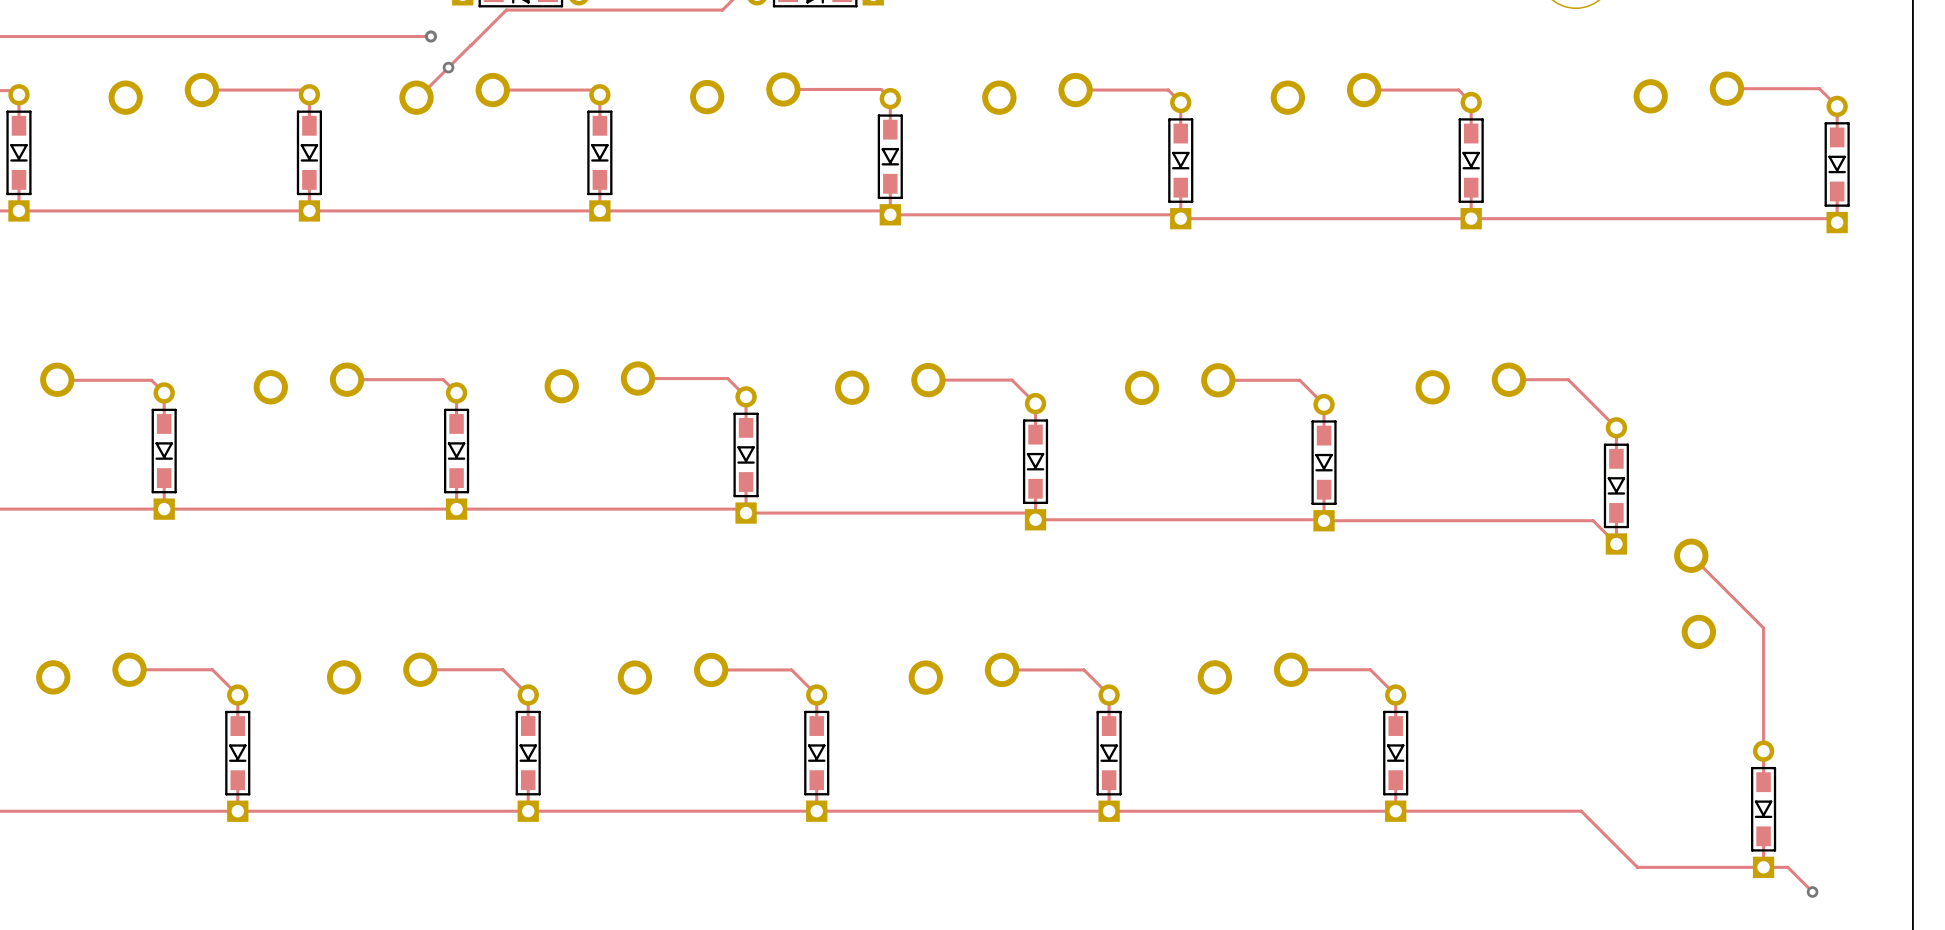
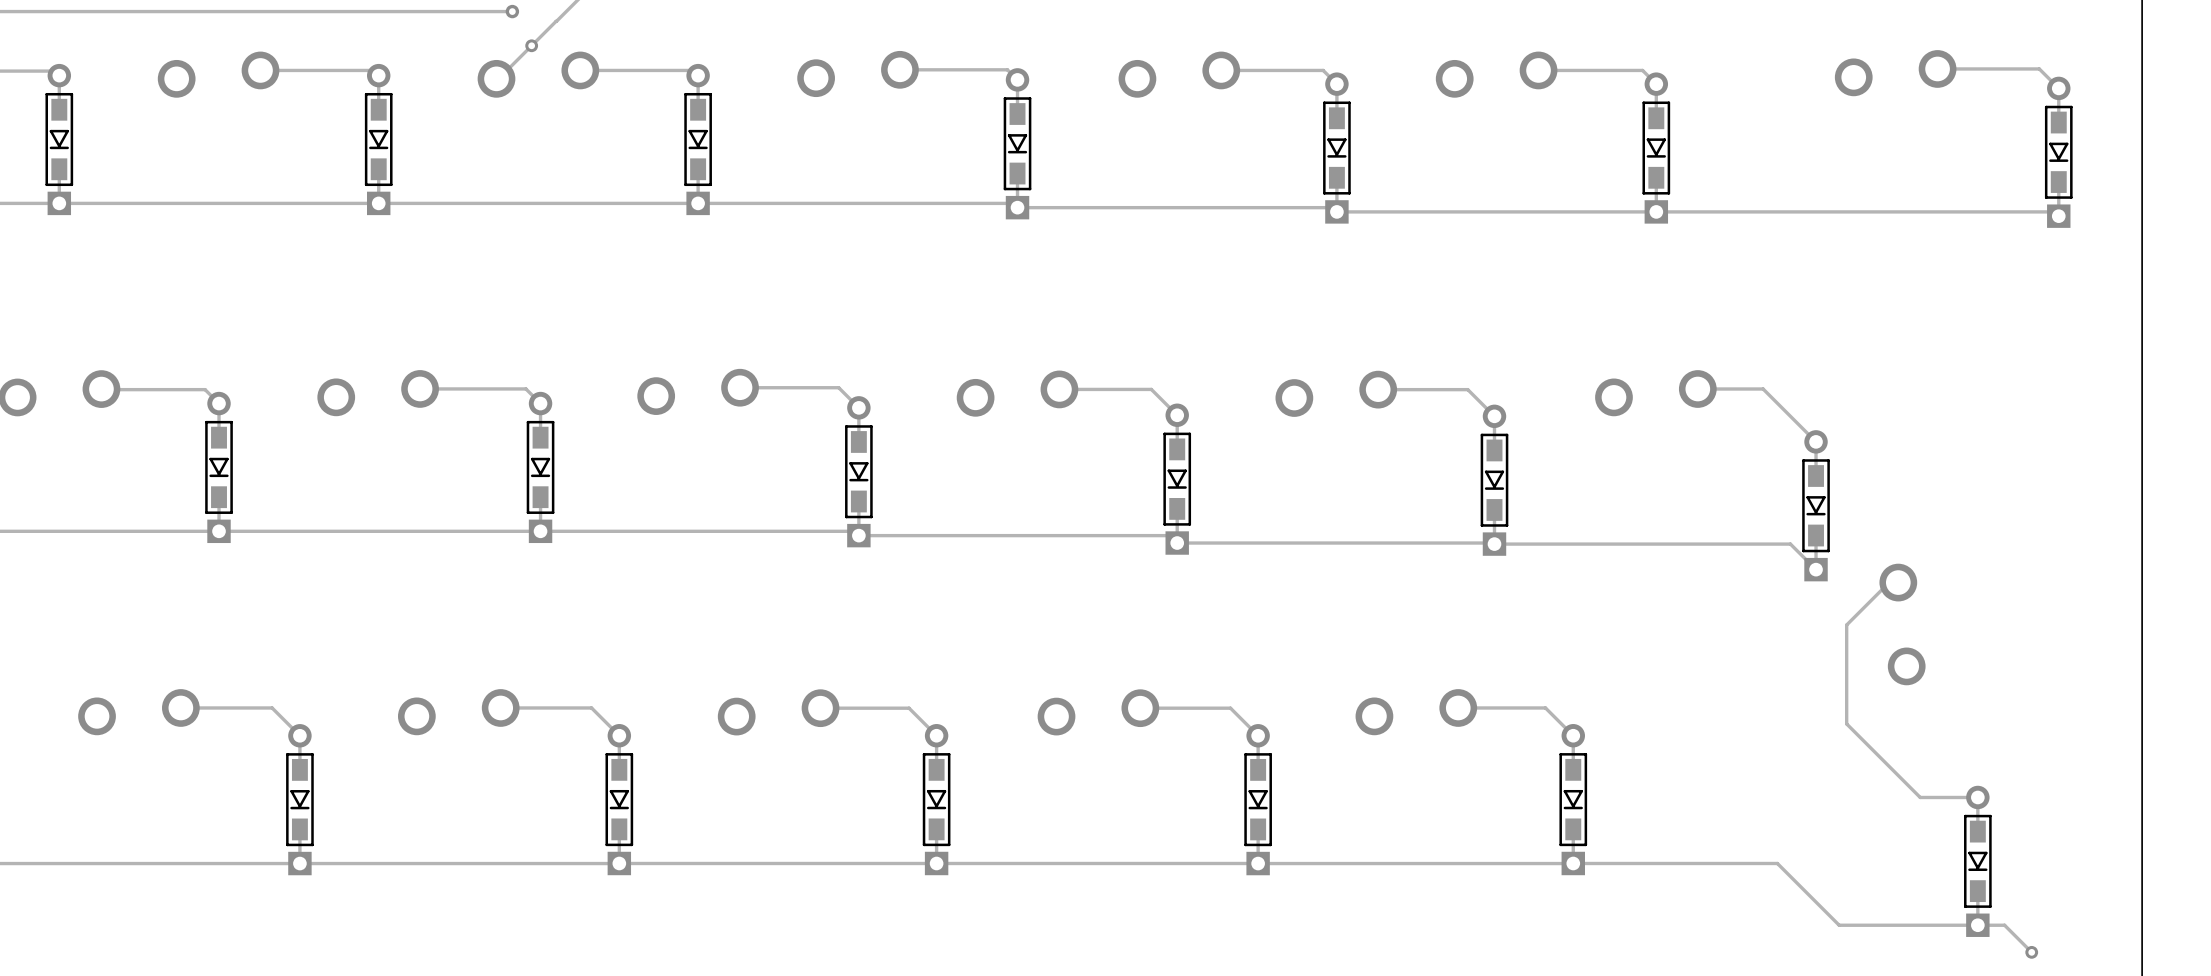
track: (1691, 555) (1763, 628) (1763, 751) -> (1889, 581) (1846, 625) (1846, 723) (1920, 797) (1977, 797)

